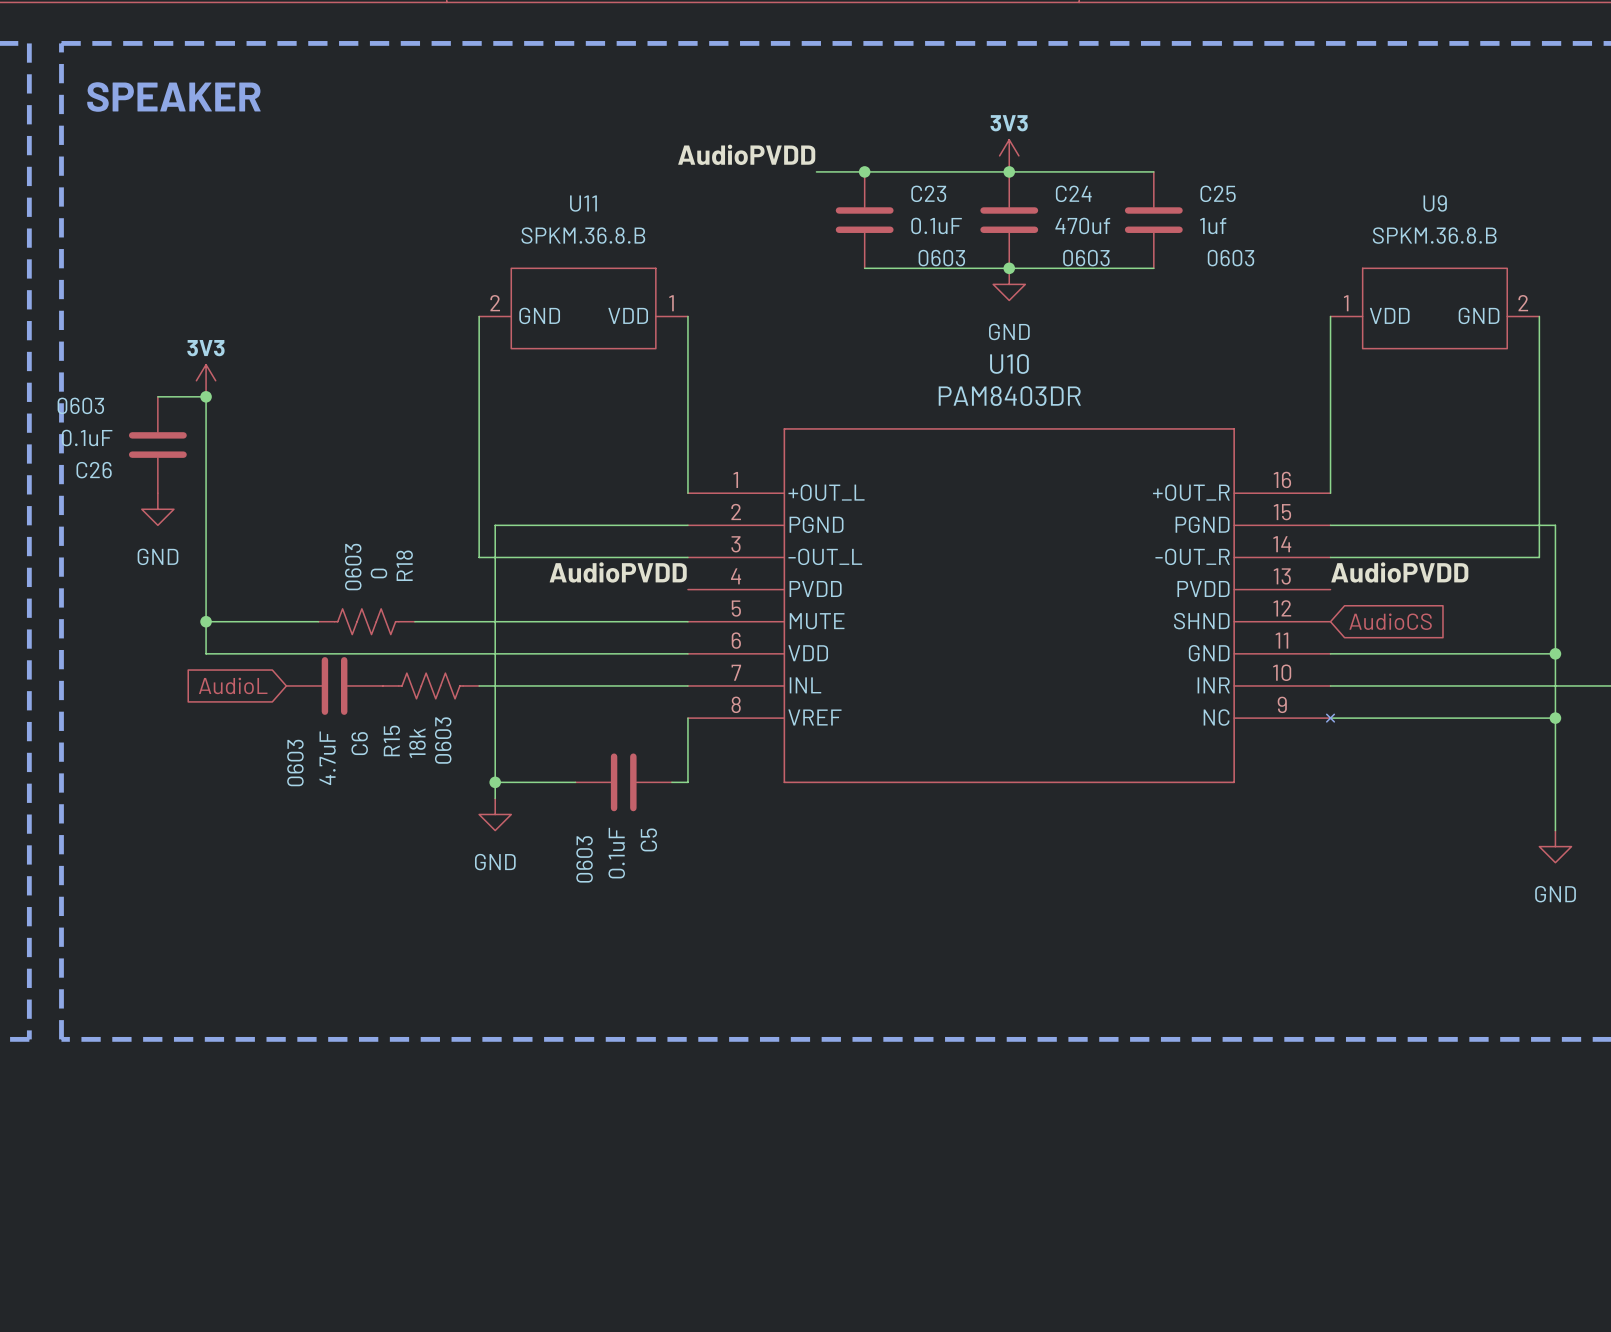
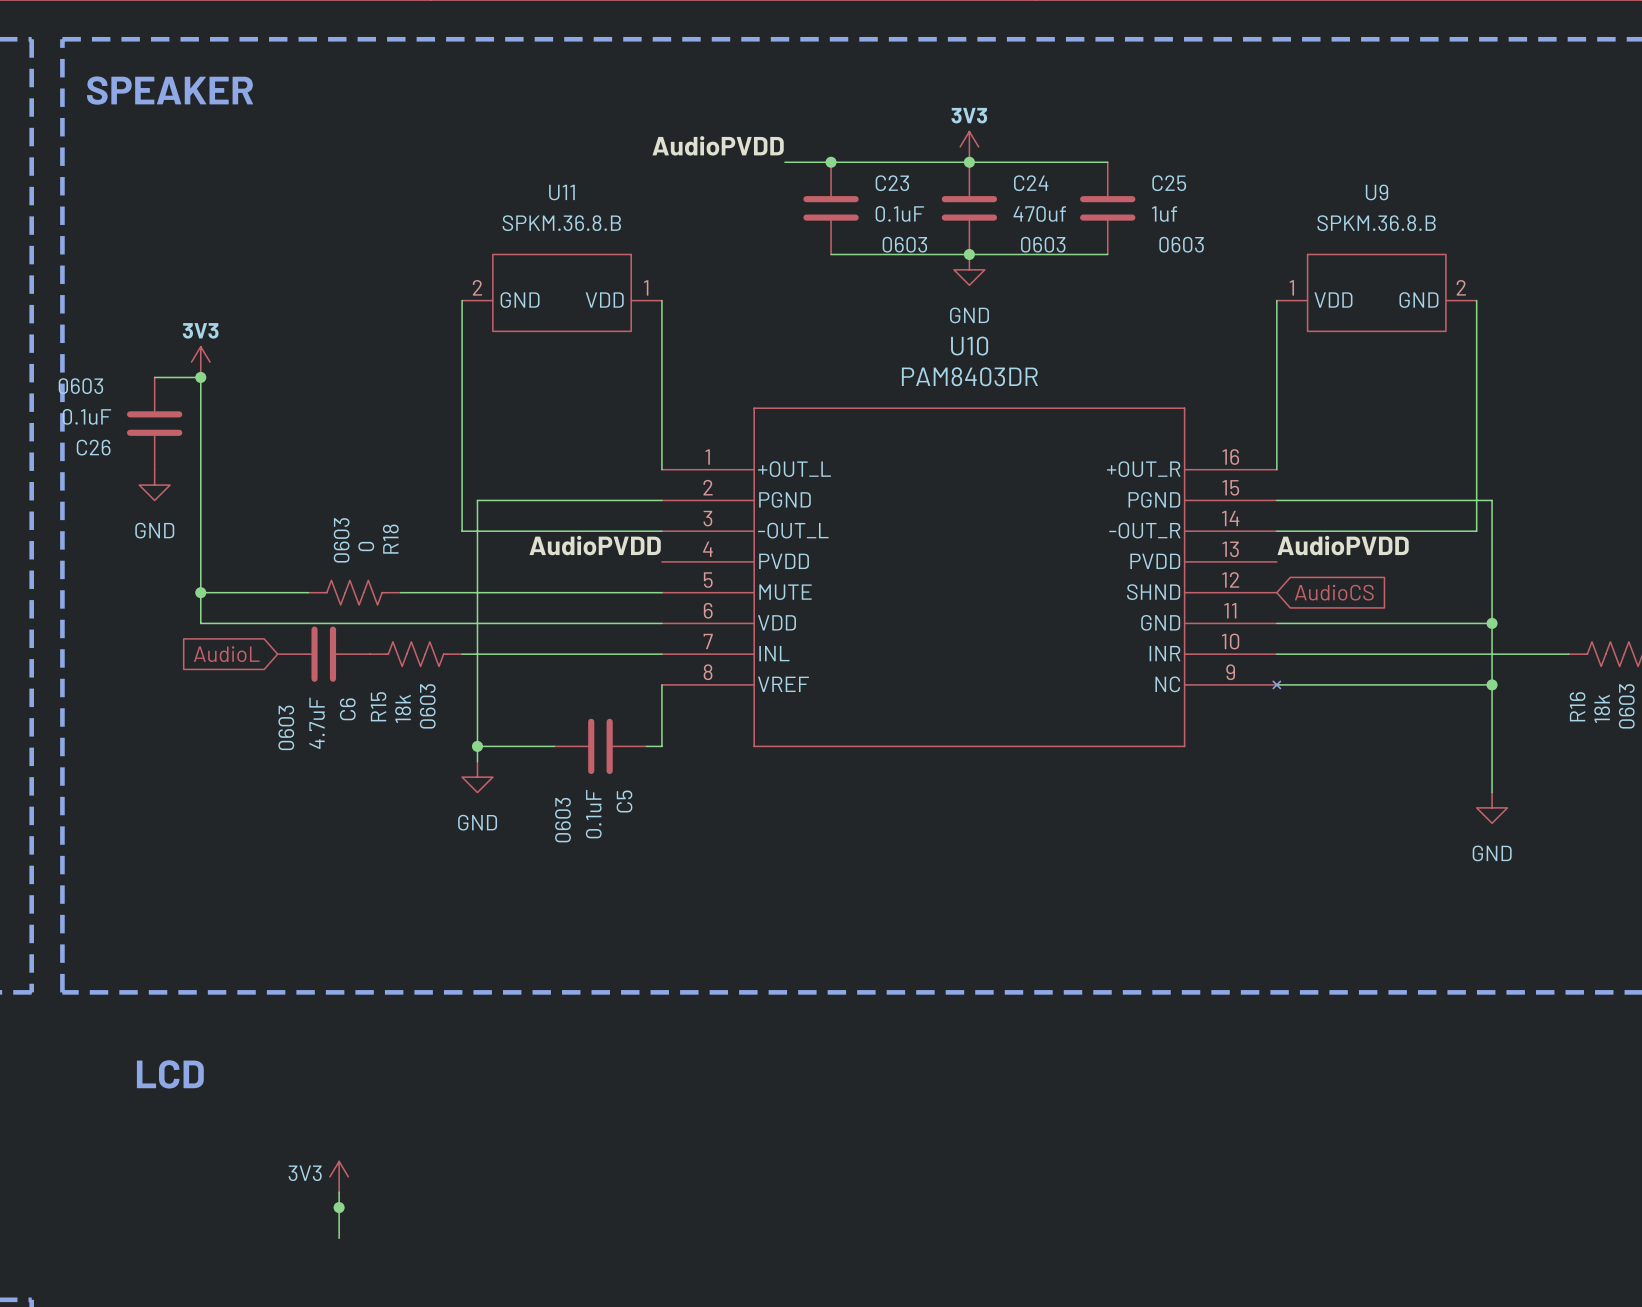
text: none -> LCD (170, 1074)
power symbol: none -> 3V3 (339, 1176)
wire: none -> (339, 1192) (339, 1238)
junction: none -> (339, 1207)

